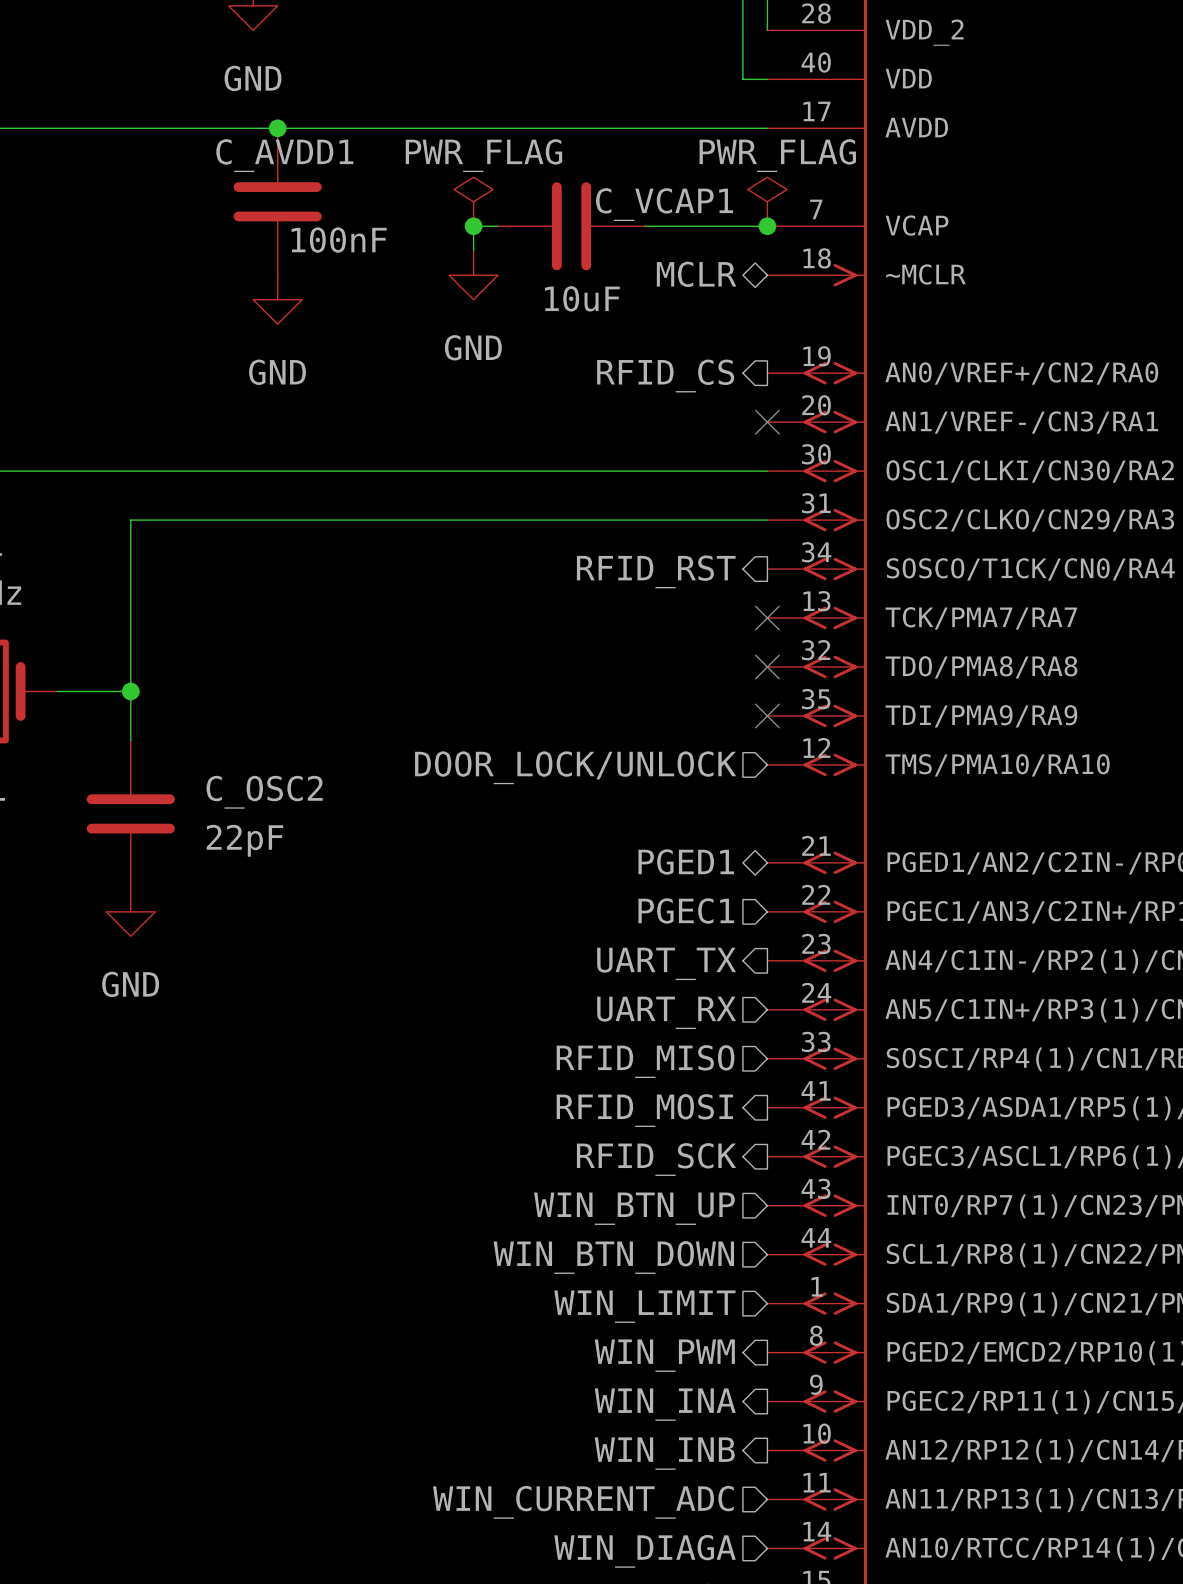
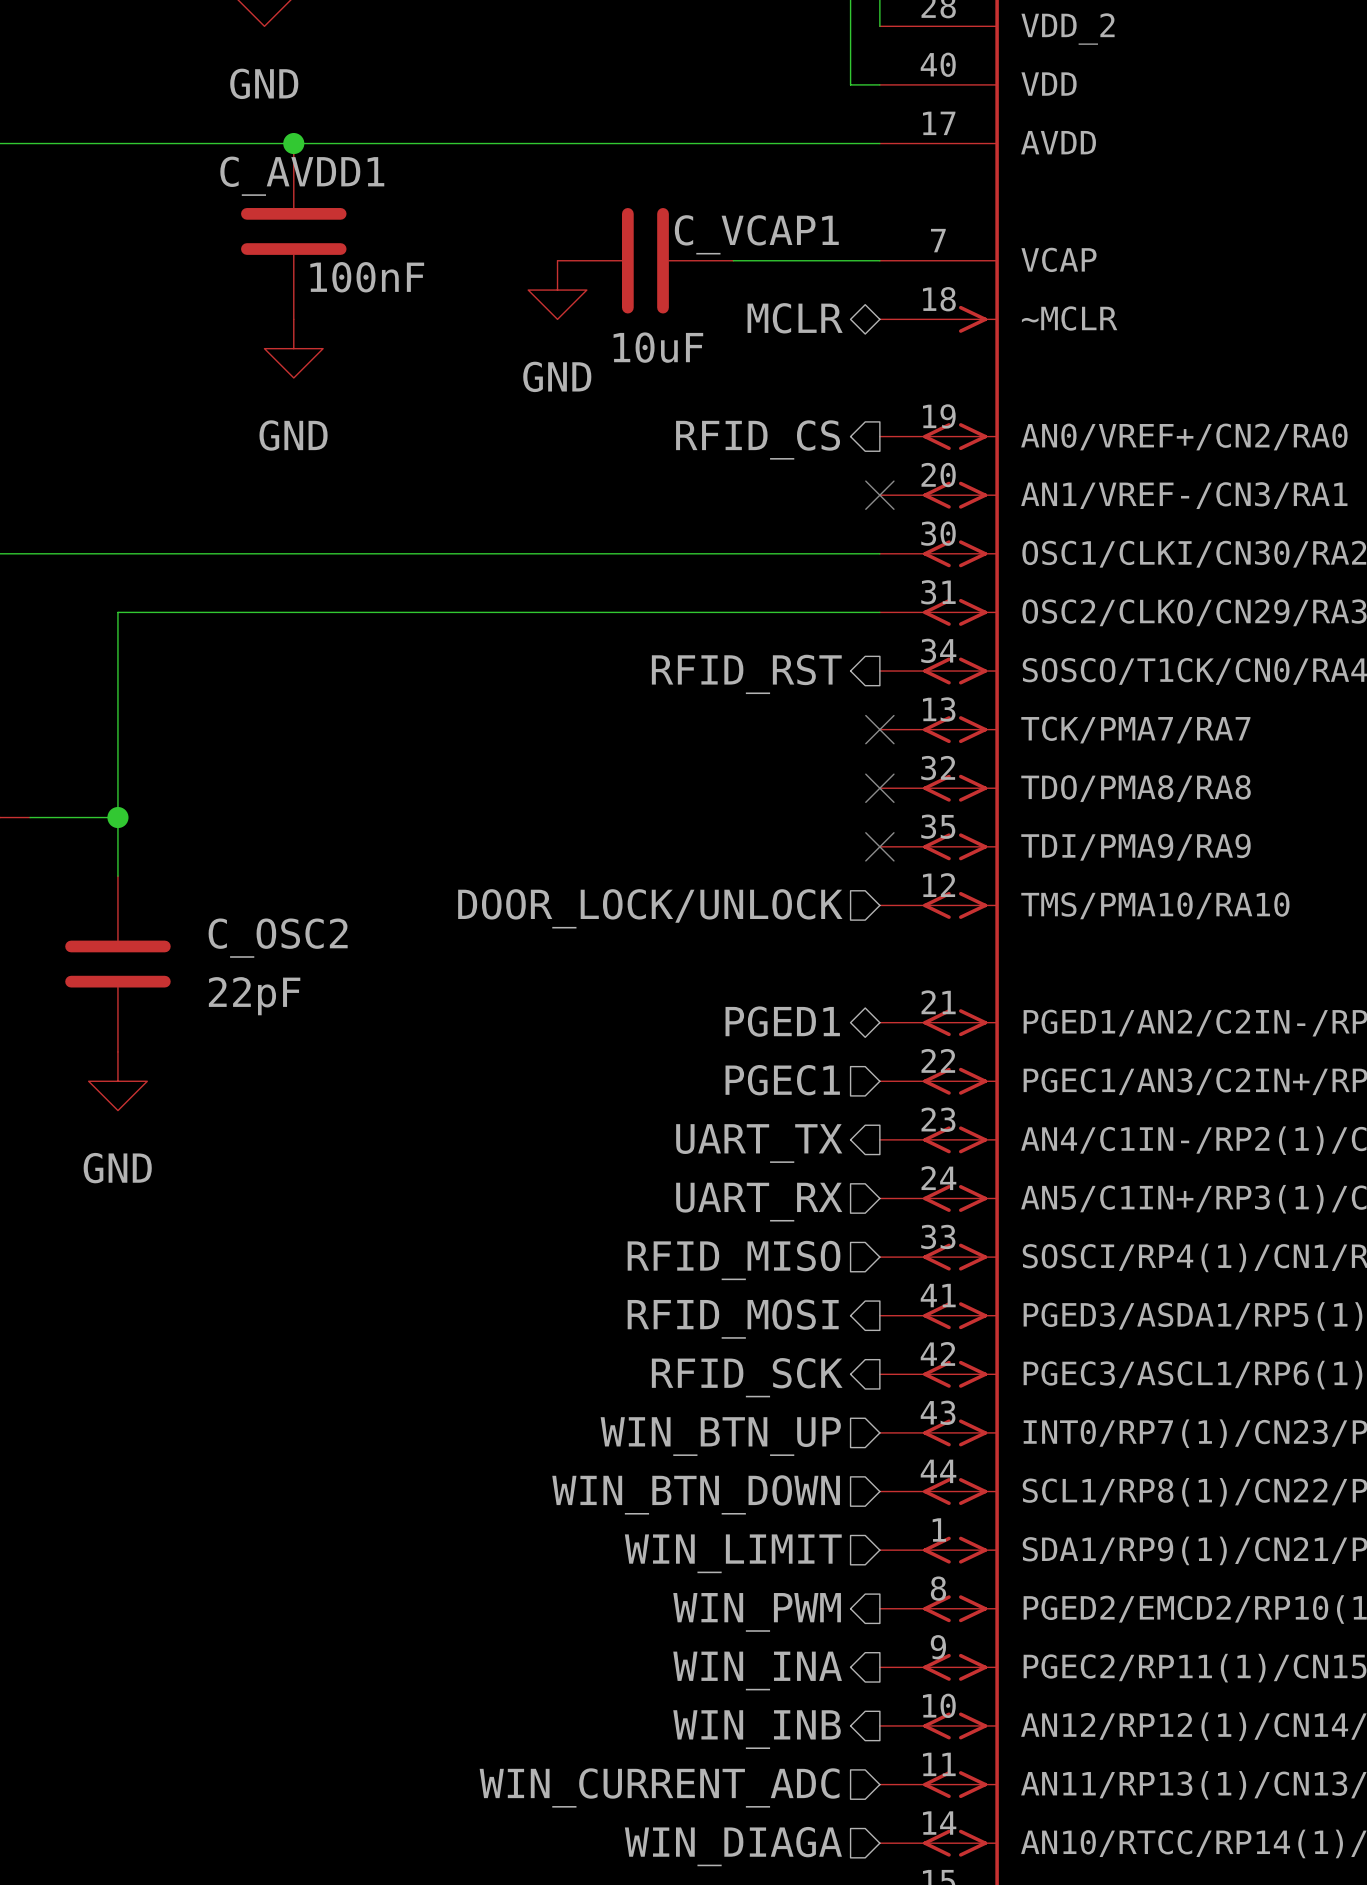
power symbol: PWR_FLAG (473, 201) -> none
power symbol: PWR_FLAG (767, 201) -> none
junction: (473, 226) -> none
wire: (498, 226) (473, 226) (473, 250) -> none
junction: (767, 226) -> none
power symbol position: GND (473, 275) -> GND (557, 290)

